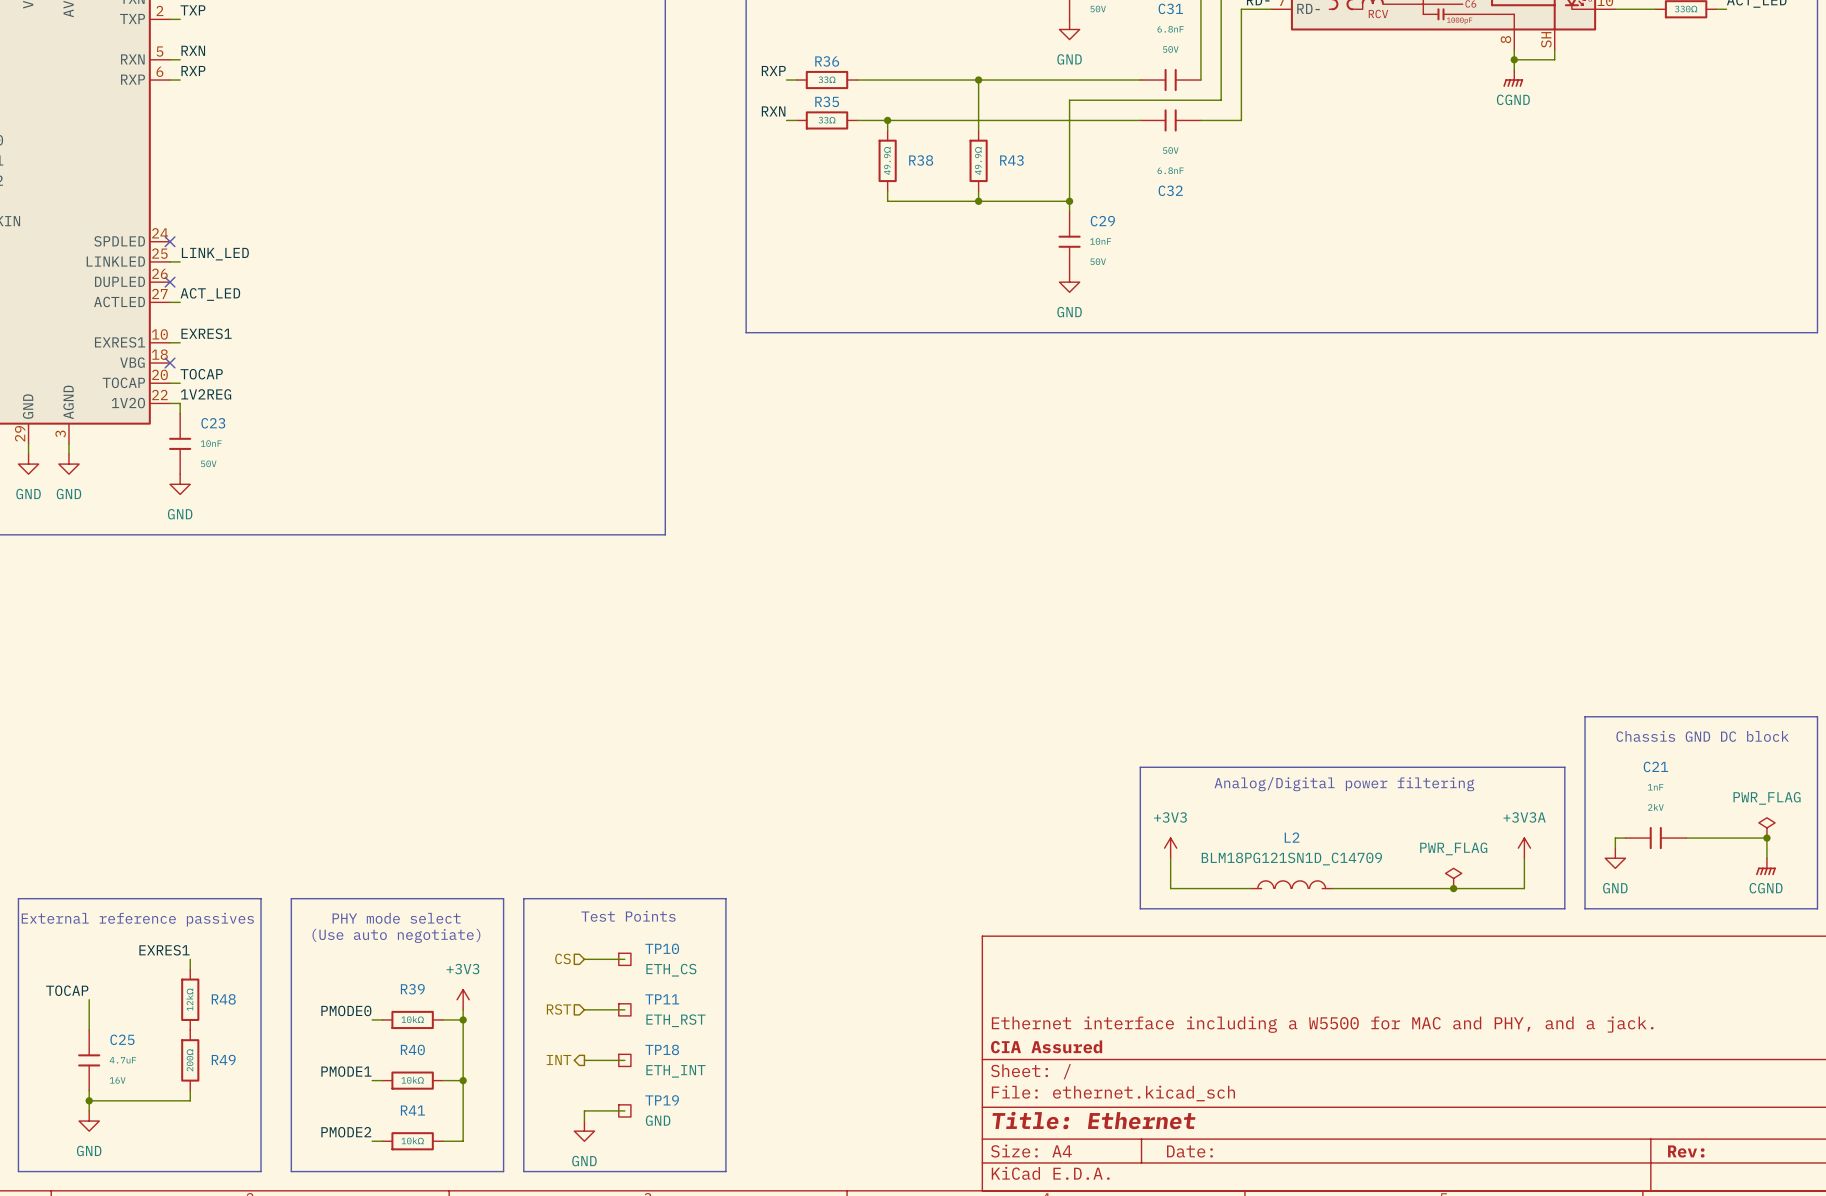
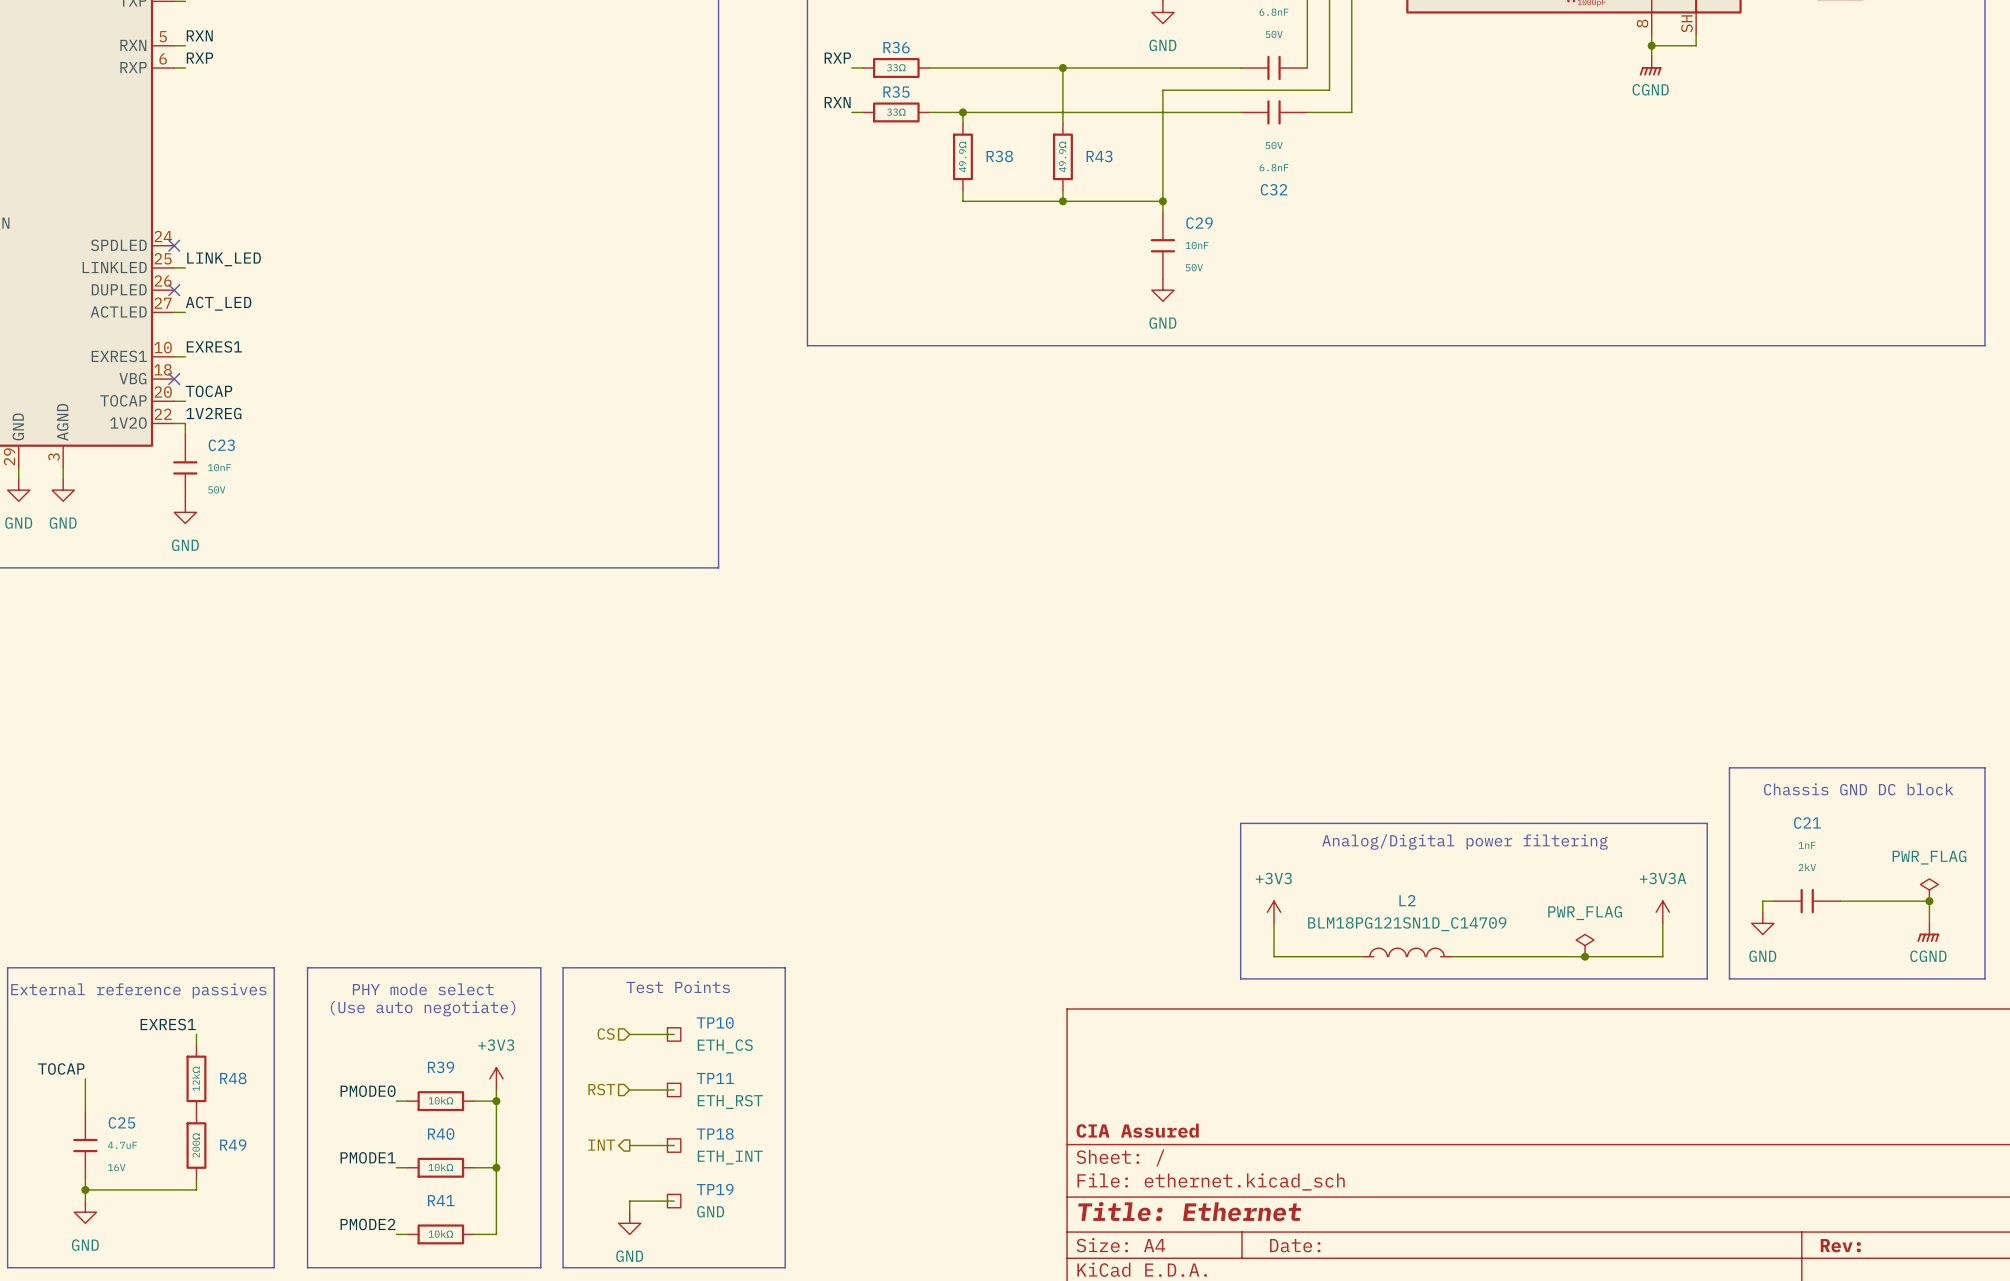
title block: Ethernet interface including a W5500 for MAC and PHY, and a jack. (1322, 1024) -> none

